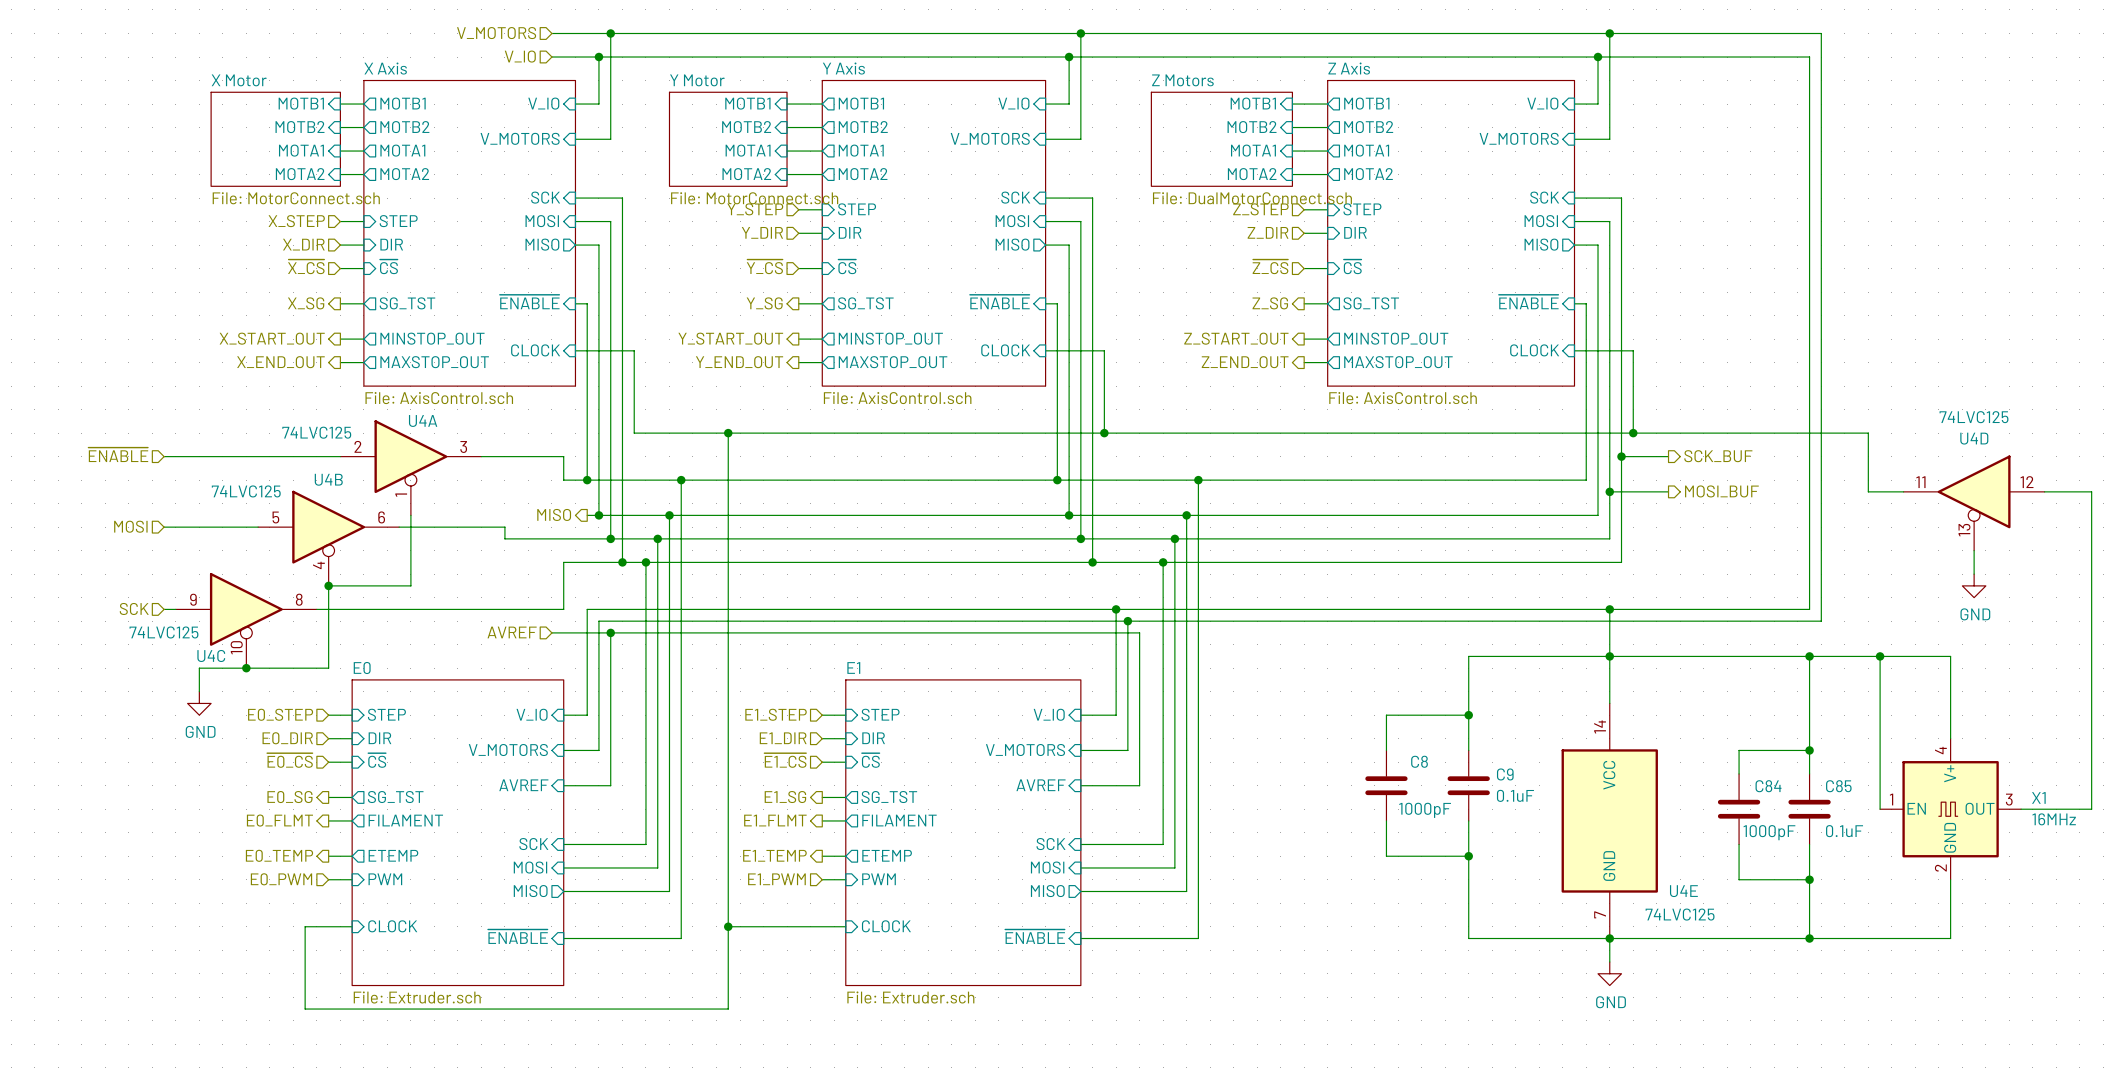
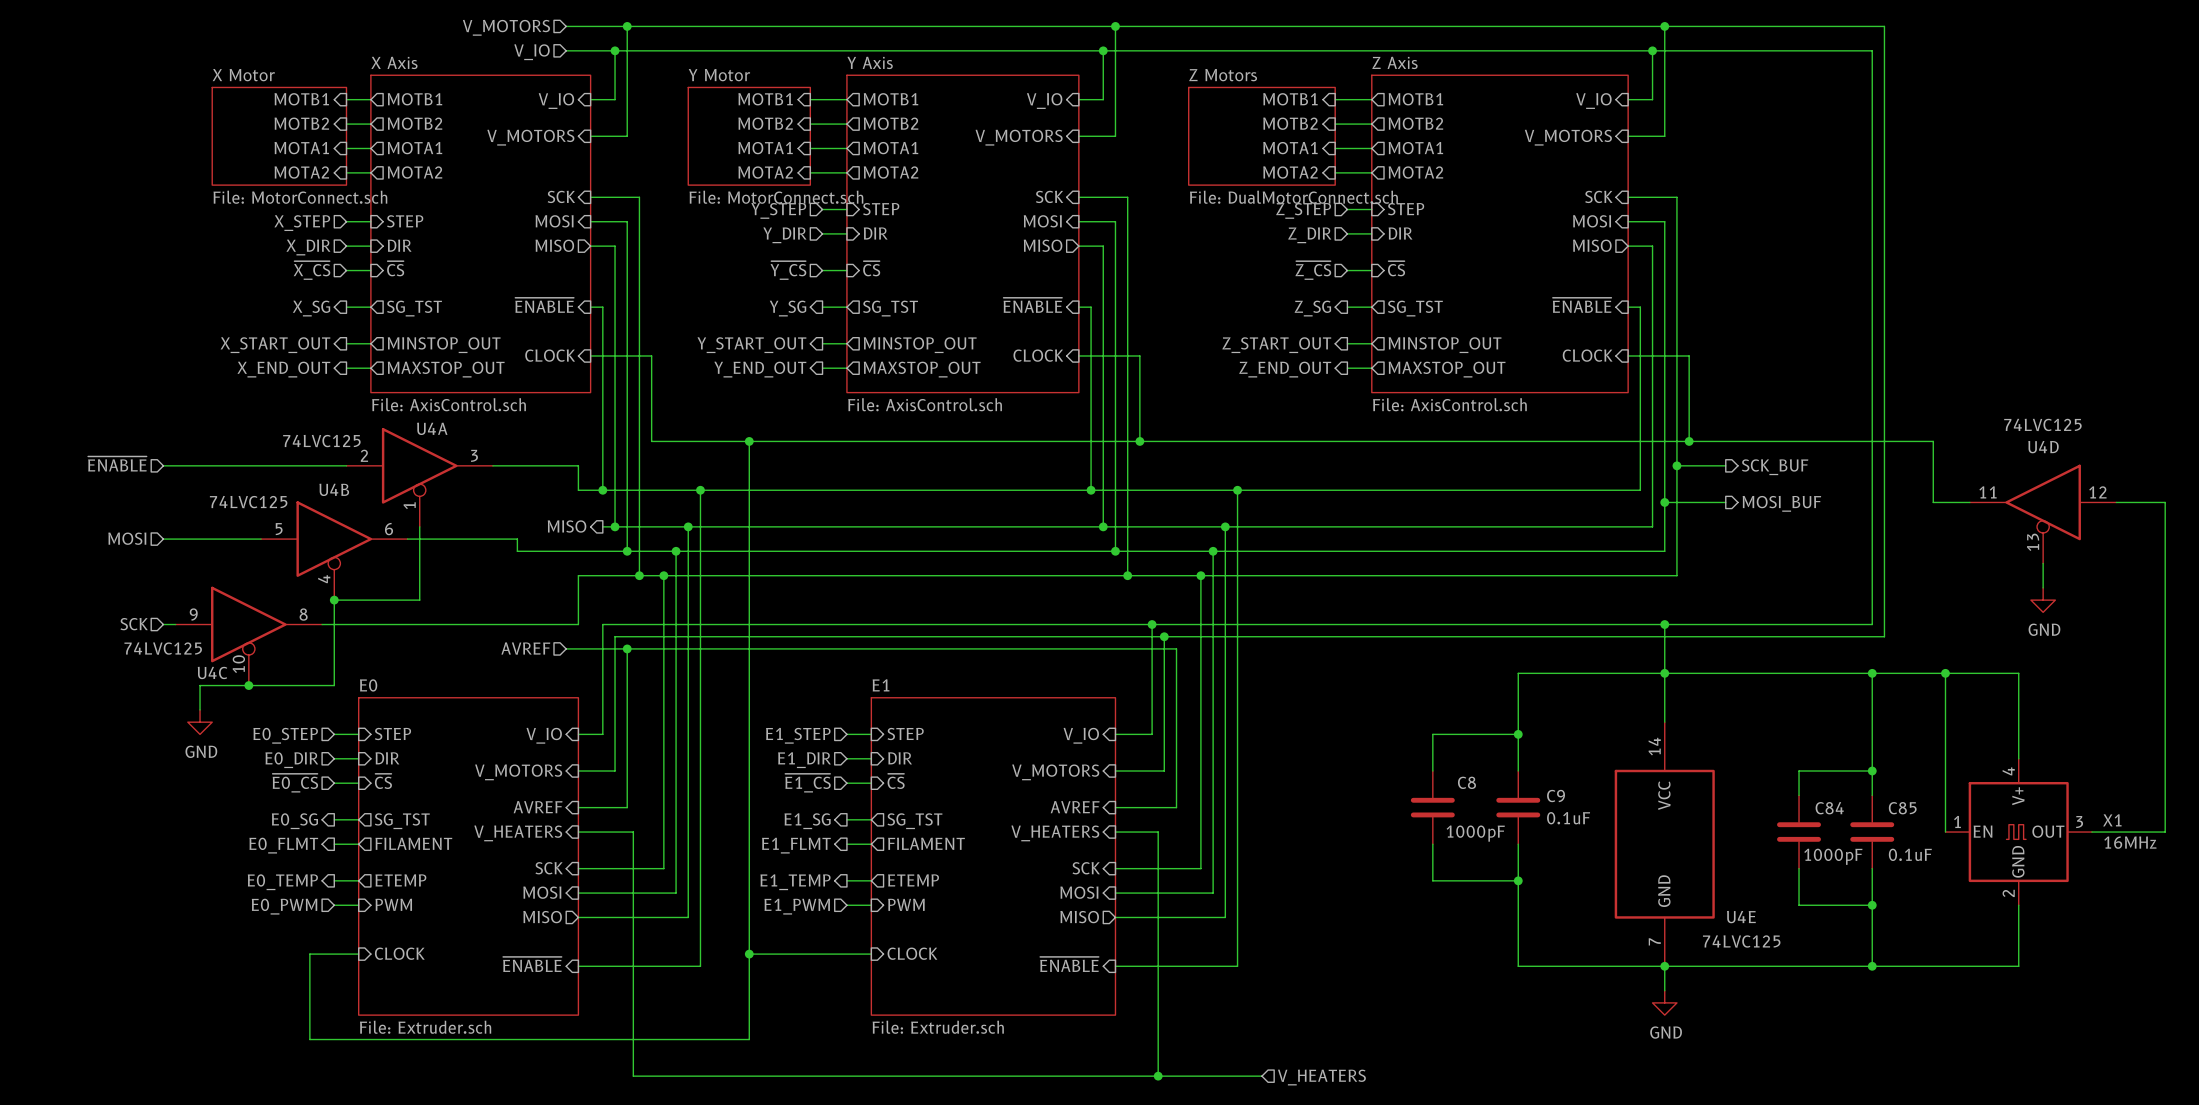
sheet pin: none -> V_HEATERS (518, 833)
sheet pin: none -> V_HEATERS (1055, 833)
wire: none -> (578, 832) (633, 832) (633, 1076) (1261, 1076)
wire: none -> (1115, 832) (1158, 832) (1158, 1076)
hierarchical label: none -> V_HEATERS (1321, 1077)
junction: none -> (1158, 1076)

